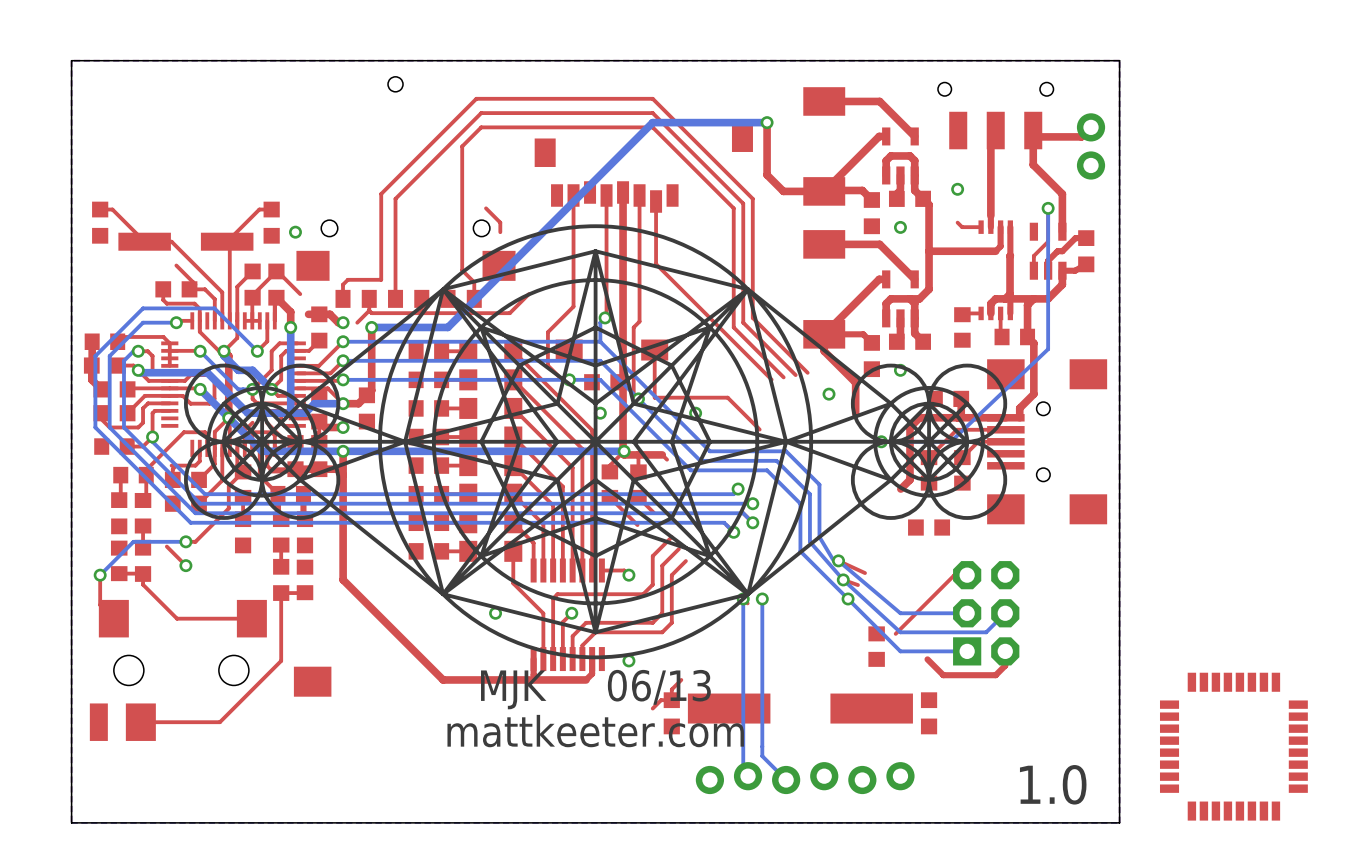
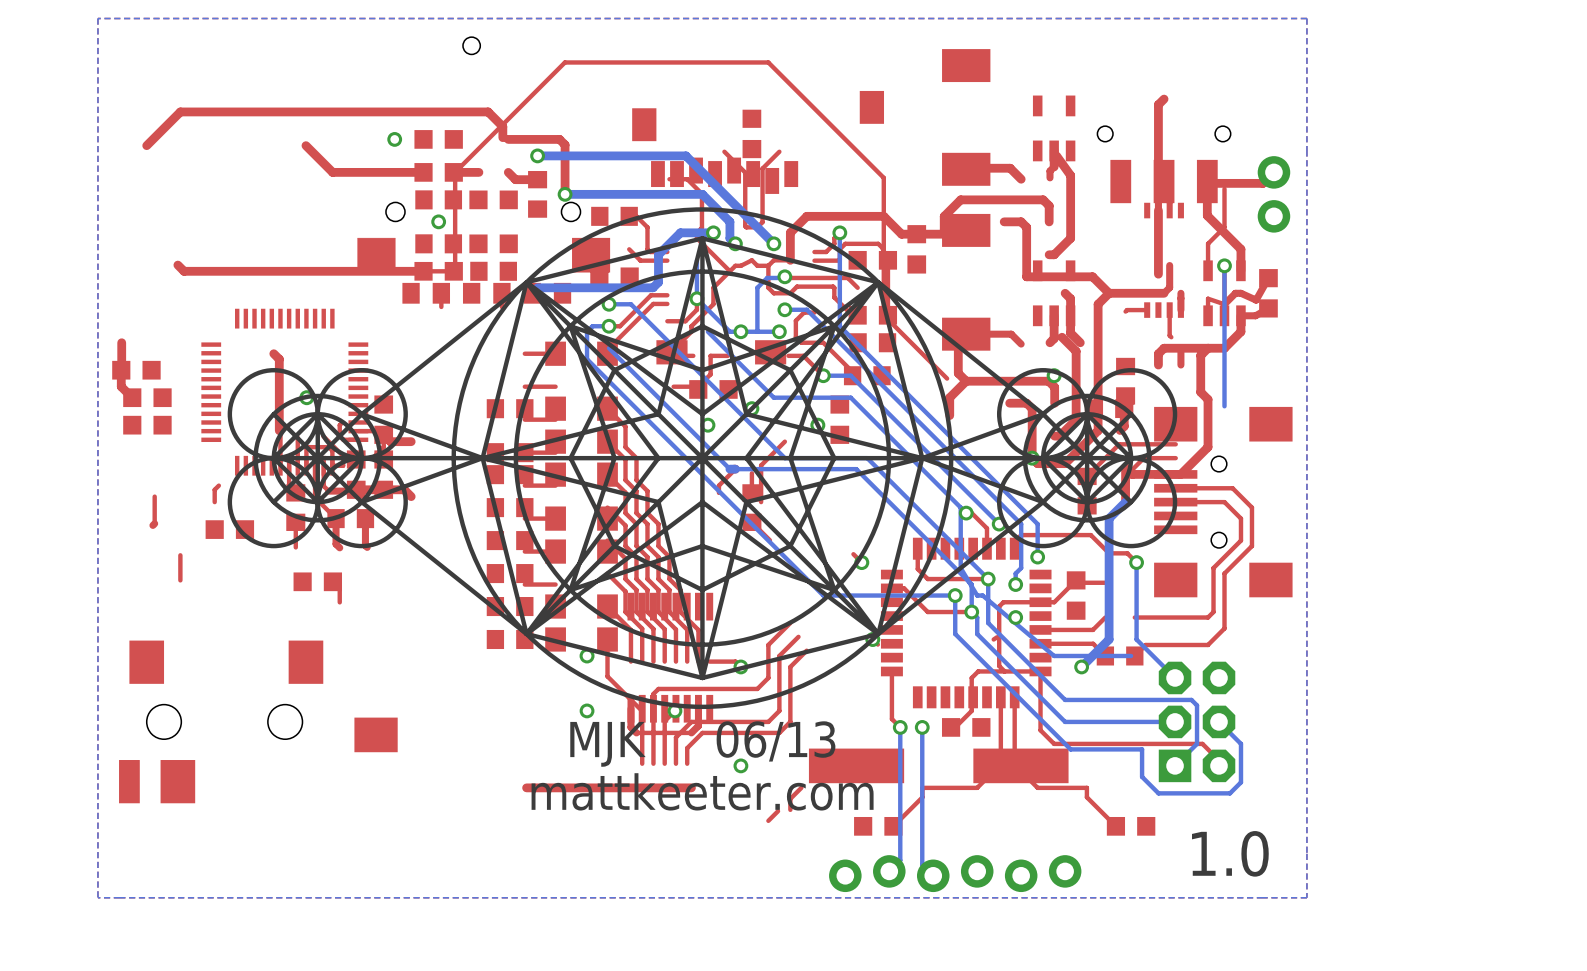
board edge: (1119, 60) (71, 60) (71, 822) (1119, 822) (1119, 60) -> none
top track: (824, 101) (879, 101) (914, 136) -> none
part position: (995, 115) -> (1164, 164)
top track: (767, 122) (767, 175) (783, 191) (824, 191) (879, 136) (886, 136) -> none
bottom track: (767, 122) (652, 122) (447, 327) (371, 327) -> none
via: (767, 122) -> none
top track: (1091, 127) (1081, 136) (1039, 136) (1033, 130) (1033, 164) (1062, 194) (1062, 231) -> none
part position: (1091, 146) -> (1273, 194)
part: none -> (751, 133)
via: none -> (394, 139)
part: none -> (438, 139)
top track: none -> (146, 145) (180, 111) (488, 111) (502, 126) (502, 137) (508, 139) (559, 139) (565, 144) (565, 194)
top track: none -> (305, 145) (332, 172) (423, 172) (423, 177)
top track: (886, 175) (886, 160) (890, 155) (909, 155) (914, 160) (914, 190) (929, 204) (929, 289) (919, 298) (890, 298) (886, 303) (886, 318) -> none
top track: none -> (779, 151) (762, 168) (762, 222) (757, 227) (745, 226) (745, 172) (724, 151)
bottom track: none -> (537, 155) (685, 155) (773, 243)
via: none -> (537, 155)
top track: none -> (1056, 155) (1070, 175) (1070, 238) (1054, 254) (1049, 254)
via: (957, 189) -> none
top track: (623, 192) (623, 453) (662, 454) (667, 459) -> none
part: none -> (438, 172)
top track: none -> (478, 172) (453, 172)
top track: none -> (508, 172) (515, 179) (537, 179)
top track: (573, 195) (573, 306) (547, 332) (547, 365) (562, 379) (569, 379) -> none
top track: (606, 195) (605, 317) -> none
top track: (639, 195) (639, 321) (633, 327) (633, 394) (638, 398) -> none
part: (909, 198) -> none
top track: none -> (669, 179) (687, 179) (701, 193) (701, 227) (696, 232) (696, 238) (729, 271)
top track: (656, 201) (656, 264) (771, 379) -> none
top track: (486, 208) (500, 222) (500, 232) -> none
bottom track: (1048, 208) (1048, 275) -> none
via: (1048, 208) -> none
top track: (100, 209) (112, 209) (144, 241) (171, 241) (222, 292) (222, 320) -> none
top track: (271, 209) (259, 209) (227, 241) (229, 244) (229, 320) -> none
part: none -> (537, 194)
bottom track: none -> (565, 194) (702, 194) (729, 221) (729, 238) (735, 243)
via: none -> (565, 194)
part: (871, 213) -> none
part: none -> (438, 199)
part: none -> (493, 199)
part: (100, 222) -> none
part: (271, 222) -> none
top track: (957, 222) (962, 227) (981, 227) -> none
via: (900, 227) -> none
top track: none -> (1158, 210) (1158, 274) (1158, 265)
top track: (1000, 227) (1000, 246) (995, 251) (929, 251) -> none
top track: (1010, 227) (1010, 294) (1005, 298) -> none
via: (295, 232) -> none
part: none -> (614, 216)
top track: none -> (629, 216) (636, 216) (647, 227) (647, 249) (650, 252) (667, 252)
via: none -> (438, 221)
top track: none -> (1004, 221) (1021, 221) (1026, 227) (1026, 276) (1092, 276) (1109, 293)
top track: none -> (1049, 221) (1049, 205) (1043, 199) (960, 199) (944, 216) (944, 234) (901, 234) (883, 216) (806, 216) (790, 232) (790, 260) (773, 260) (768, 265)
top track: (1086, 238) (1075, 238) (1062, 251) (1057, 251) (1048, 260) (1048, 270) -> none
part: (185, 241) -> none
top track: (824, 244) (879, 244) (914, 279) -> none
bottom track: none -> (713, 232) (680, 232) (658, 254) (658, 282) (652, 287) (537, 287)
via: none -> (713, 232)
top track: none -> (839, 232) (834, 238) (834, 243) (826, 252) (814, 252)
bottom track: none -> (839, 232) (839, 326) (1037, 524) (1037, 557)
via: none -> (839, 232)
part position: (1048, 251) -> (1224, 293)
part position: (1086, 251) -> (1268, 293)
part: none -> (438, 243)
part: none -> (493, 243)
via: none -> (735, 243)
via: none -> (773, 243)
top track: none -> (629, 249) (640, 260) (667, 260)
part: none -> (916, 249)
top track: (1086, 264) (1075, 270) (1062, 270) -> (1273, 172) (1262, 183) (1214, 183) (1207, 181) (1207, 215) (1240, 249) (1240, 260)
top track: (176, 265) (195, 284) -> none
bottom track: none -> (696, 260) (696, 298) (729, 331) (779, 331)
top track: none -> (814, 260) (839, 260) (839, 249) (845, 243) (878, 243) (887, 260) (887, 315)
part: none -> (872, 260)
top track: (252, 271) (237, 286) (237, 337) (224, 351) (219, 351) (199, 331) (199, 308) (194, 303) (166, 303) (163, 300) (163, 289) -> none
top track: none -> (1169, 265) (1169, 287) (1164, 293) (1109, 293)
top track: none -> (768, 265) (768, 287) (773, 293) (790, 293) (797, 286) (833, 286) (834, 297) (852, 315) (857, 315)
top track: none -> (768, 265) (757, 265) (751, 260) (740, 265) (735, 265) (713, 287) (713, 304) (691, 326) (691, 331) (673, 348) (681, 355) (693, 355)
via: none -> (1224, 265)
top track: (347, 279) (343, 284) (343, 298) -> (416, 271) (184, 271) (177, 265)
part: none -> (438, 271)
part: none -> (493, 271)
top track: (886, 279) (879, 279) (824, 334) (824, 351) (855, 382) (856, 413) -> none
top track: (1062, 279) (1062, 284) (1048, 298) (995, 298) (990, 303) (990, 313) -> none
top track: (193, 282) (189, 285) (189, 289) (204, 289) (214, 299) (214, 320) -> none
part: (252, 284) -> none
part: (276, 284) -> none
part: none -> (614, 276)
top track: none -> (784, 276) (847, 277) (857, 287)
bottom track: none -> (784, 276) (786, 277) (767, 277) (757, 287) (757, 331)
via: none -> (784, 276)
top track: none -> (1268, 278) (1256, 300) (1240, 293) (1235, 293) (1224, 304)
part: (176, 289) -> none
top track: (300, 294) (276, 271) (252, 295) (252, 320) -> none
top track: (528, 294) (509, 313) (424, 313) (421, 310) (419, 313) (371, 313) (369, 310) (357, 322) -> none
top track: (395, 298) (395, 198) (481, 113) (652, 113) (743, 203) (743, 322) (795, 375) -> none
top track: (474, 298) (474, 282) (462, 270) (462, 146) (481, 127) (652, 127) (733, 208) (733, 327) (783, 377) -> none
top track: none -> (1109, 293) (1098, 304) (1098, 430) (1065, 463) (1037, 463) (1033, 459)
top track: (1033, 298) (1027, 305) (1027, 336) (1033, 343) (1033, 390) -> (1208, 348) (1200, 355) (1200, 392) (1208, 399)
top track: none -> (667, 295) (650, 295) (620, 326) (609, 326)
top track: none -> (696, 298) (696, 309) (685, 321) (667, 321)
via: none -> (696, 298)
via: none -> (609, 304)
top track: none -> (667, 303) (653, 303) (609, 348)
top track: none -> (1224, 304) (1208, 298) (1208, 315)
top track: none -> (1268, 308) (1255, 315) (1240, 315) (1240, 331) (1224, 348) (1164, 348) (1158, 353) (1158, 365)
bottom track: none -> (784, 309) (806, 309) (1021, 524) (1021, 568) (1015, 573) (1015, 584)
via: none -> (784, 309)
top track: (308, 314) (329, 314) (338, 322) (343, 322) -> none
top track: none -> (814, 312) (804, 312) (795, 320) (795, 337) (801, 342) (823, 342) (852, 372) (852, 375)
bottom track: (605, 317) (600, 322) (600, 341) -> none
via: (605, 317) -> none
part: none -> (872, 315)
top track: (192, 320) (178, 320) (176, 322) -> none
top track: (259, 320) (244, 320) -> none
top track: (267, 320) (267, 341) (257, 351) -> none
top track: (274, 320) (276, 297) (290, 312) (290, 327) -> none
bottom track: (176, 322) (143, 322) (109, 356) (109, 427) (195, 513) (743, 513) (752, 522) -> none
via: (176, 322) -> none
via: (343, 322) -> none
bottom track: (290, 327) (290, 413) -> none
via: (290, 327) -> none
part: (319, 327) -> none
top track: (371, 327) (371, 390) (358, 403) (343, 403) (327, 388) (297, 388) -> none
via: (371, 327) -> none
bottom track: none -> (609, 326) (592, 326) (587, 331) (587, 359) (823, 595) (955, 595) (955, 634) (1070, 749) (1142, 749) (1142, 776) (1158, 793) (1230, 793) (1240, 782) (1240, 743) (1219, 721)
via: none -> (609, 326)
part: (962, 327) -> none
via: none -> (740, 331)
via: none -> (779, 331)
top track: none -> (958, 337) (958, 373) (966, 381)
top track: none -> (1062, 337) (1076, 351) (1076, 419) (1059, 436) (1054, 436)
part: (1014, 336) -> none
top track: (319, 340) (309, 350) (286, 350) (281, 356) (281, 379) (271, 389) (278, 395) (297, 395) -> none
part: (104, 341) -> none
top track: (117, 341) (122, 336) (163, 336) (169, 343) (169, 365) -> none
top track: (343, 341) (318, 365) (297, 365) -> none
via: (343, 341) -> none
bottom track: (600, 341) (709, 451) -> (735, 469) (834, 469)
bottom track: (600, 341) (343, 341) -> none
part: none -> (872, 342)
part: (909, 341) -> none
top track: (297, 343) (279, 343) (271, 351) (271, 370) (252, 389) (252, 398) (264, 410) (297, 410) -> none
top track: none -> (1180, 348) (1180, 365)
bottom track: (1048, 349) (950, 441) (881, 441) -> (1224, 351) (1224, 406)
top track: (169, 350) (200, 351) -> none
top track: (654, 350) (654, 397) (727, 397) (759, 429) -> none
top track: (138, 351) (147, 351) (152, 356) (152, 370) (155, 373) (169, 373) -> none
bottom track: (138, 351) (133, 351) (123, 360) (123, 427) (200, 503) (752, 503) -> none
via: (138, 351) -> none
bottom track: (200, 351) (238, 389) (252, 389) -> none
via: (200, 351) -> none
bottom track: (224, 351) (224, 356) (238, 370) (252, 370) (271, 389) -> none
via: (224, 351) -> none
bottom track: (257, 351) (214, 308) (143, 308) (95, 356) (95, 427) (190, 522) (724, 522) (733, 532) -> none
via: (257, 351) -> none
part: (428, 351) -> none
top track: (513, 351) (592, 430) (592, 570) -> none
top track: none -> (727, 355) (710, 355) (710, 374) (698, 386) (673, 386)
top track: none -> (788, 355) (803, 355) (823, 375)
part: (871, 356) -> none
top track: (343, 360) (330, 373) (297, 373) -> none
bottom track: (343, 360) (600, 360) (700, 460) (776, 460) (809, 494) (809, 541) (843, 579) (900, 632) (986, 632) (1005, 613) -> none
via: (343, 360) -> none
top track: (118, 365) (133, 365) (148, 380) (184, 380) (190, 375) (209, 375) (214, 379) (214, 398) (209, 403) (190, 403) (182, 395) (144, 395) (127, 413) -> none
bottom track: (138, 370) (140, 372) (207, 372) (247, 413) (305, 413) (314, 403) (343, 403) -> none
via: (138, 370) -> none
bottom track: none -> (823, 375) (850, 375) (999, 524)
via: none -> (823, 375)
part: none -> (867, 375)
top track: none -> (966, 381) (1048, 381) (1054, 387) (1054, 403)
top track: none -> (966, 381) (949, 397) (949, 415)
part: none -> (1125, 381)
top track: (343, 379) (297, 380) -> none
bottom track: (343, 379) (600, 379) (690, 470) (767, 470) -> (609, 304) (631, 304) (784, 458) (867, 458) (900, 491)
via: (343, 379) -> none
part: (428, 379) -> none
part: (490, 379) -> none
top track: (513, 379) (582, 448) (582, 570) -> none
via: (569, 379) -> none
top track: (200, 389) (127, 389) -> none
bottom track: (200, 389) (262, 451) (619, 451) -> (609, 348) (729, 469)
via: (200, 389) -> none
via: (271, 389) -> none
via: (829, 394) -> none
top track: none -> (1009, 403) (1026, 403) (1032, 408) (1032, 458)
top track: (1033, 394) (1019, 408) (1019, 417) (919, 417) (909, 427) (909, 479) (900, 489) -> (1208, 403) (1208, 447) (1180, 474) (1132, 474) (1125, 467) (1125, 502)
part: none -> (510, 408)
part: none -> (581, 408)
top track: none -> (607, 408) (625, 426) (625, 447) (636, 458) (636, 480) (647, 491) (647, 513) (658, 524) (658, 546) (669, 557) (669, 579) (680, 590) (680, 612) (698, 630) (698, 661)
top track: (169, 403) (148, 403) (143, 408) (143, 422) (138, 427) (109, 427) (101, 419) (101, 413) -> none
top track: (297, 403) (257, 403) -> none
via: (343, 403) -> none
part: (366, 408) -> none
part: (428, 408) -> none
part: (490, 408) -> none
top track: (513, 408) (572, 467) (572, 570) -> none
part: none -> (839, 419)
top track: (169, 410) (154, 410) (152, 413) (152, 437) (143, 446) (127, 446) -> none
top track: (228, 417) (214, 431) (214, 464) (199, 479) -> none
via: (228, 417) -> none
top track: (252, 422) (244, 430) -> none
via: (343, 427) -> none
part: none -> (581, 441)
top track: none -> (607, 441) (625, 459) (625, 480) (636, 491) (636, 513) (647, 524) (647, 546) (658, 557) (658, 579) (669, 590) (669, 612) (687, 629) (687, 661)
top track: none -> (784, 441) (761, 465) (761, 502)
bottom track: (152, 437) (152, 441) (204, 494) (733, 494) (738, 489) -> none
via: (152, 437) -> none
part: (490, 437) -> none
top track: (513, 437) (562, 486) (562, 570) -> none
part position: (1047, 441) -> (1223, 502)
part: (114, 446) -> none
top track: (199, 448) (199, 461) (195, 465) (171, 465) -> none
top track: (207, 448) (207, 434) (204, 432) (184, 432) (146, 470) (146, 497) (143, 500) -> none
top track: (222, 448) (222, 480) (199, 503) -> none
top track: (343, 451) (343, 579) (443, 679) (586, 679) -> none
via: (343, 451) -> none
via: (624, 451) -> none
bottom track: none -> (856, 469) (971, 584) (971, 612) (977, 617) (977, 634) (1065, 721) (1175, 721)
bottom track: (786, 451) (728, 451) -> (922, 469) (850, 397) (773, 397) (707, 331)
part: none -> (510, 474)
part: none -> (581, 474)
top track: none -> (607, 474) (625, 492) (625, 513) (636, 524) (636, 546) (647, 557) (647, 579) (658, 590) (658, 612) (675, 629) (675, 661)
part: (428, 465) -> none
part: (490, 465) -> none
top track: (513, 465) (553, 505) (553, 570) -> none
top track: none -> (1175, 488) (1232, 488) (1251, 507) (1251, 546) (1224, 573) (1224, 628) (1208, 644) (1145, 644) (1134, 655)
part: (962, 470) -> none
part: (133, 475) -> none
top track: (243, 475) (243, 471) (228, 486) (228, 508) (195, 541) (185, 541) -> none
part: (185, 479) -> none
bottom track: none -> (1125, 502) (1109, 518) (1109, 639) (1081, 666)
top track: none -> (1175, 502) (1224, 502) (1240, 518) (1240, 540) (1213, 568) (1213, 612) (1208, 617) (1134, 617)
part: none -> (510, 507)
top track: none -> (607, 507) (625, 525) (625, 546) (636, 557) (636, 579) (647, 590) (647, 612) (664, 629) (664, 661)
part: (609, 484) -> none
via: (738, 489) -> none
top track: none -> (966, 513) (971, 513) (986, 528) (986, 548)
via: none -> (966, 513)
part: (428, 494) -> none
top track: (513, 494) (543, 524) (543, 570) -> none
top track: (609, 497) (637, 525) -> none
via: none -> (999, 524)
via: (752, 503) -> none
bottom track: (800, 503) (800, 551) (900, 651) (909, 651) -> (938, 529) (988, 579) (988, 623) (1065, 699)
part: (119, 513) -> none
part: (143, 513) -> none
part: none -> (510, 540)
top track: none -> (917, 548) (917, 569) (927, 579) (988, 579)
top track: none -> (1014, 548) (1014, 541) (1021, 535) (1090, 535) (1109, 553) (1127, 553) (1136, 562)
part: (428, 522) -> none
top track: (513, 522) (533, 543) (533, 570) -> (607, 606) (630, 629) (630, 661)
via: (752, 522) -> none
via: none -> (1037, 557)
part rotation: 0° (929, 527) -> 90° clockwise (1076, 595)
part position: (929, 527) -> (1076, 595)
part: (243, 532) -> none
part: (281, 532) -> none
part: (305, 532) -> none
bottom track: none -> (1136, 562) (1136, 639) (1175, 677)
via: none -> (1136, 562)
top track: (671, 537) (652, 556) (652, 584) (643, 594) (557, 594) (553, 598) -> (607, 540) (625, 558) (625, 579) (636, 590) (636, 612) (653, 628) (653, 639)
bottom track: (185, 541) (133, 541) (100, 575) -> none
via: (185, 541) -> none
part: none -> (510, 573)
top track: (166, 546) (181, 560) -> none
via: none -> (988, 579)
part: none -> (317, 581)
top track: (678, 549) (662, 565) (662, 613) (652, 622) (586, 622) (572, 636) (572, 659) -> (798, 636) (779, 655) (779, 710) (768, 721) (691, 721) (675, 737) (675, 763)
top track: none -> (1109, 582) (1078, 582) (1076, 580) (1054, 602) (1003, 602) (999, 606) (999, 665) (1004, 671)
part: (428, 551) -> none
part position: (490, 551) -> (581, 606)
top track: (513, 551) (513, 583) (543, 613) -> (607, 573) (625, 591) (625, 612) (642, 628) (642, 656)
via: none -> (1015, 584)
top track: none -> (891, 588) (904, 588) (927, 612) (971, 612)
part: (119, 560) -> none
part: (143, 560) -> none
via: none -> (955, 595)
top track: (838, 560) (865, 573) -> none
via: (838, 560) -> none
top track: (685, 561) (671, 575) (671, 622) (662, 632) (595, 632) (582, 645) (582, 659) -> (806, 650) (790, 666) (790, 721) (779, 732) (702, 732) (687, 748) (687, 763)
via: (185, 565) -> none
part: none -> (510, 606)
top track: (601, 570) (624, 570) (628, 575) -> (709, 661) (735, 661) (740, 666)
top track: (119, 571) (119, 573) (142, 573) (143, 584) (177, 618) (251, 618) -> none
top track: (100, 575) (100, 604) (113, 618) -> none
via: (100, 575) -> none
via: (628, 575) -> none
via: none -> (971, 612)
top track: (967, 575) (954, 575) (895, 633) -> none
part: (281, 579) -> none
part: (305, 579) -> none
top track: (843, 579) (857, 585) -> none
via: (843, 579) -> none
via: none -> (1015, 617)
top track: none -> (1105, 617) (1092, 629) (1040, 629)
part: none -> (966, 623)
top track: (305, 592) (281, 593) (281, 660) (219, 722) (140, 722) -> none
part: none -> (510, 639)
part: none -> (581, 639)
top track: none -> (607, 639) (607, 676) (642, 711) (642, 763)
bottom track: (743, 598) (743, 771) (748, 776) -> none
bottom track: (762, 598) (762, 756) (786, 780) -> none
via: (762, 598) -> none
via: (848, 598) -> none
top track: none -> (1040, 643) (1093, 643) (1105, 655)
top track: (571, 613) (562, 622) (562, 659) -> (674, 710) (664, 721) (664, 763)
via: (571, 613) -> none
part: none -> (1120, 655)
part position: (986, 613) -> (1197, 721)
top track: (543, 618) (543, 659) -> none
top track: (553, 618) (553, 646) -> (790, 623) (768, 644) (768, 677) (757, 688) (658, 688) (653, 693)
via: none -> (740, 666)
via: none -> (1081, 666)
top track: none -> (891, 671) (891, 719) (900, 727)
part: (876, 646) -> none
top track: none -> (1000, 697) (1000, 764) (977, 787) (922, 787) (922, 797) (893, 826)
top track: none -> (1014, 697) (1014, 764) (1037, 787) (1086, 787) (1086, 797) (1115, 826)
bottom track: none -> (1131, 699) (1191, 699) (1197, 705) (1197, 743) (1175, 765)
top track: (1005, 651) (1005, 665) (995, 675) (943, 675) (927, 659) -> none
top track: none -> (653, 708) (653, 763)
via: none -> (587, 710)
via: none -> (674, 710)
via: (628, 660) -> none
bottom track: none -> (900, 727) (900, 860) (889, 871)
via: none -> (900, 727)
bottom track: none -> (922, 727) (922, 864) (933, 875)
via: none -> (922, 727)
top track: none -> (951, 727) (955, 727) (971, 710) (971, 677) (978, 671) (1040, 671) (1040, 730) (1054, 743) (1202, 743) (1219, 760) (1219, 765)
part: none -> (966, 727)
top track: (681, 679) (671, 689) (671, 699) -> (801, 787) (790, 798) (790, 809)
top track: (671, 700) (661, 700) (652, 708) -> none
via: none -> (740, 765)
part: (671, 713) -> none
part: (929, 713) -> none
top track: none -> (691, 787) (526, 787)
part: (1233, 746) -> none
top track: none -> (778, 811) (768, 820)
part: none -> (878, 826)
part: none -> (1131, 826)
part position: (805, 778) -> (955, 873)

